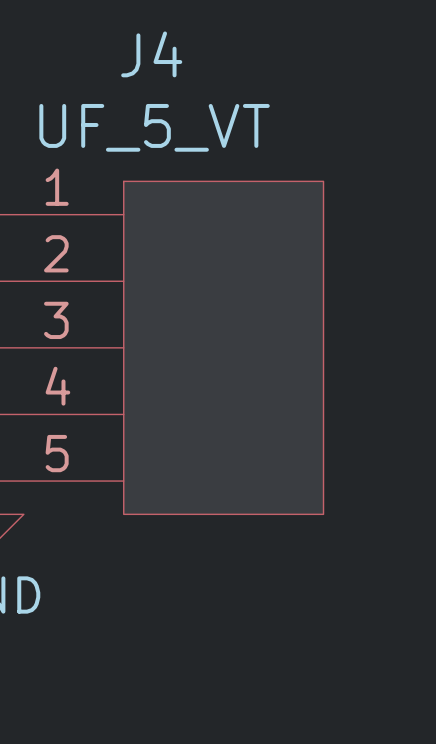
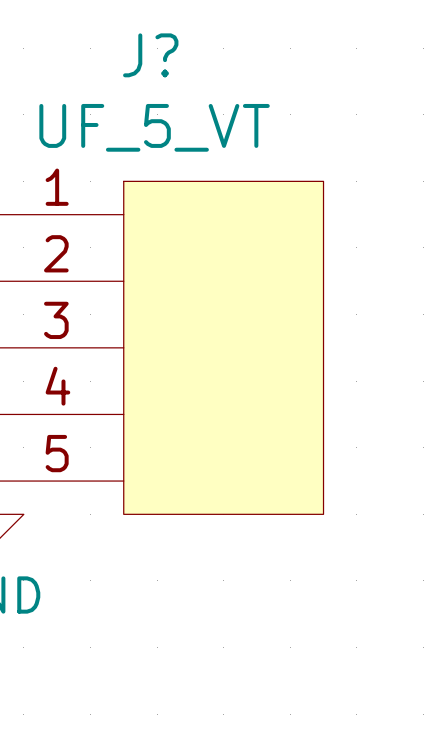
J4 name: J4 (151, 54) -> J? (150, 55)

